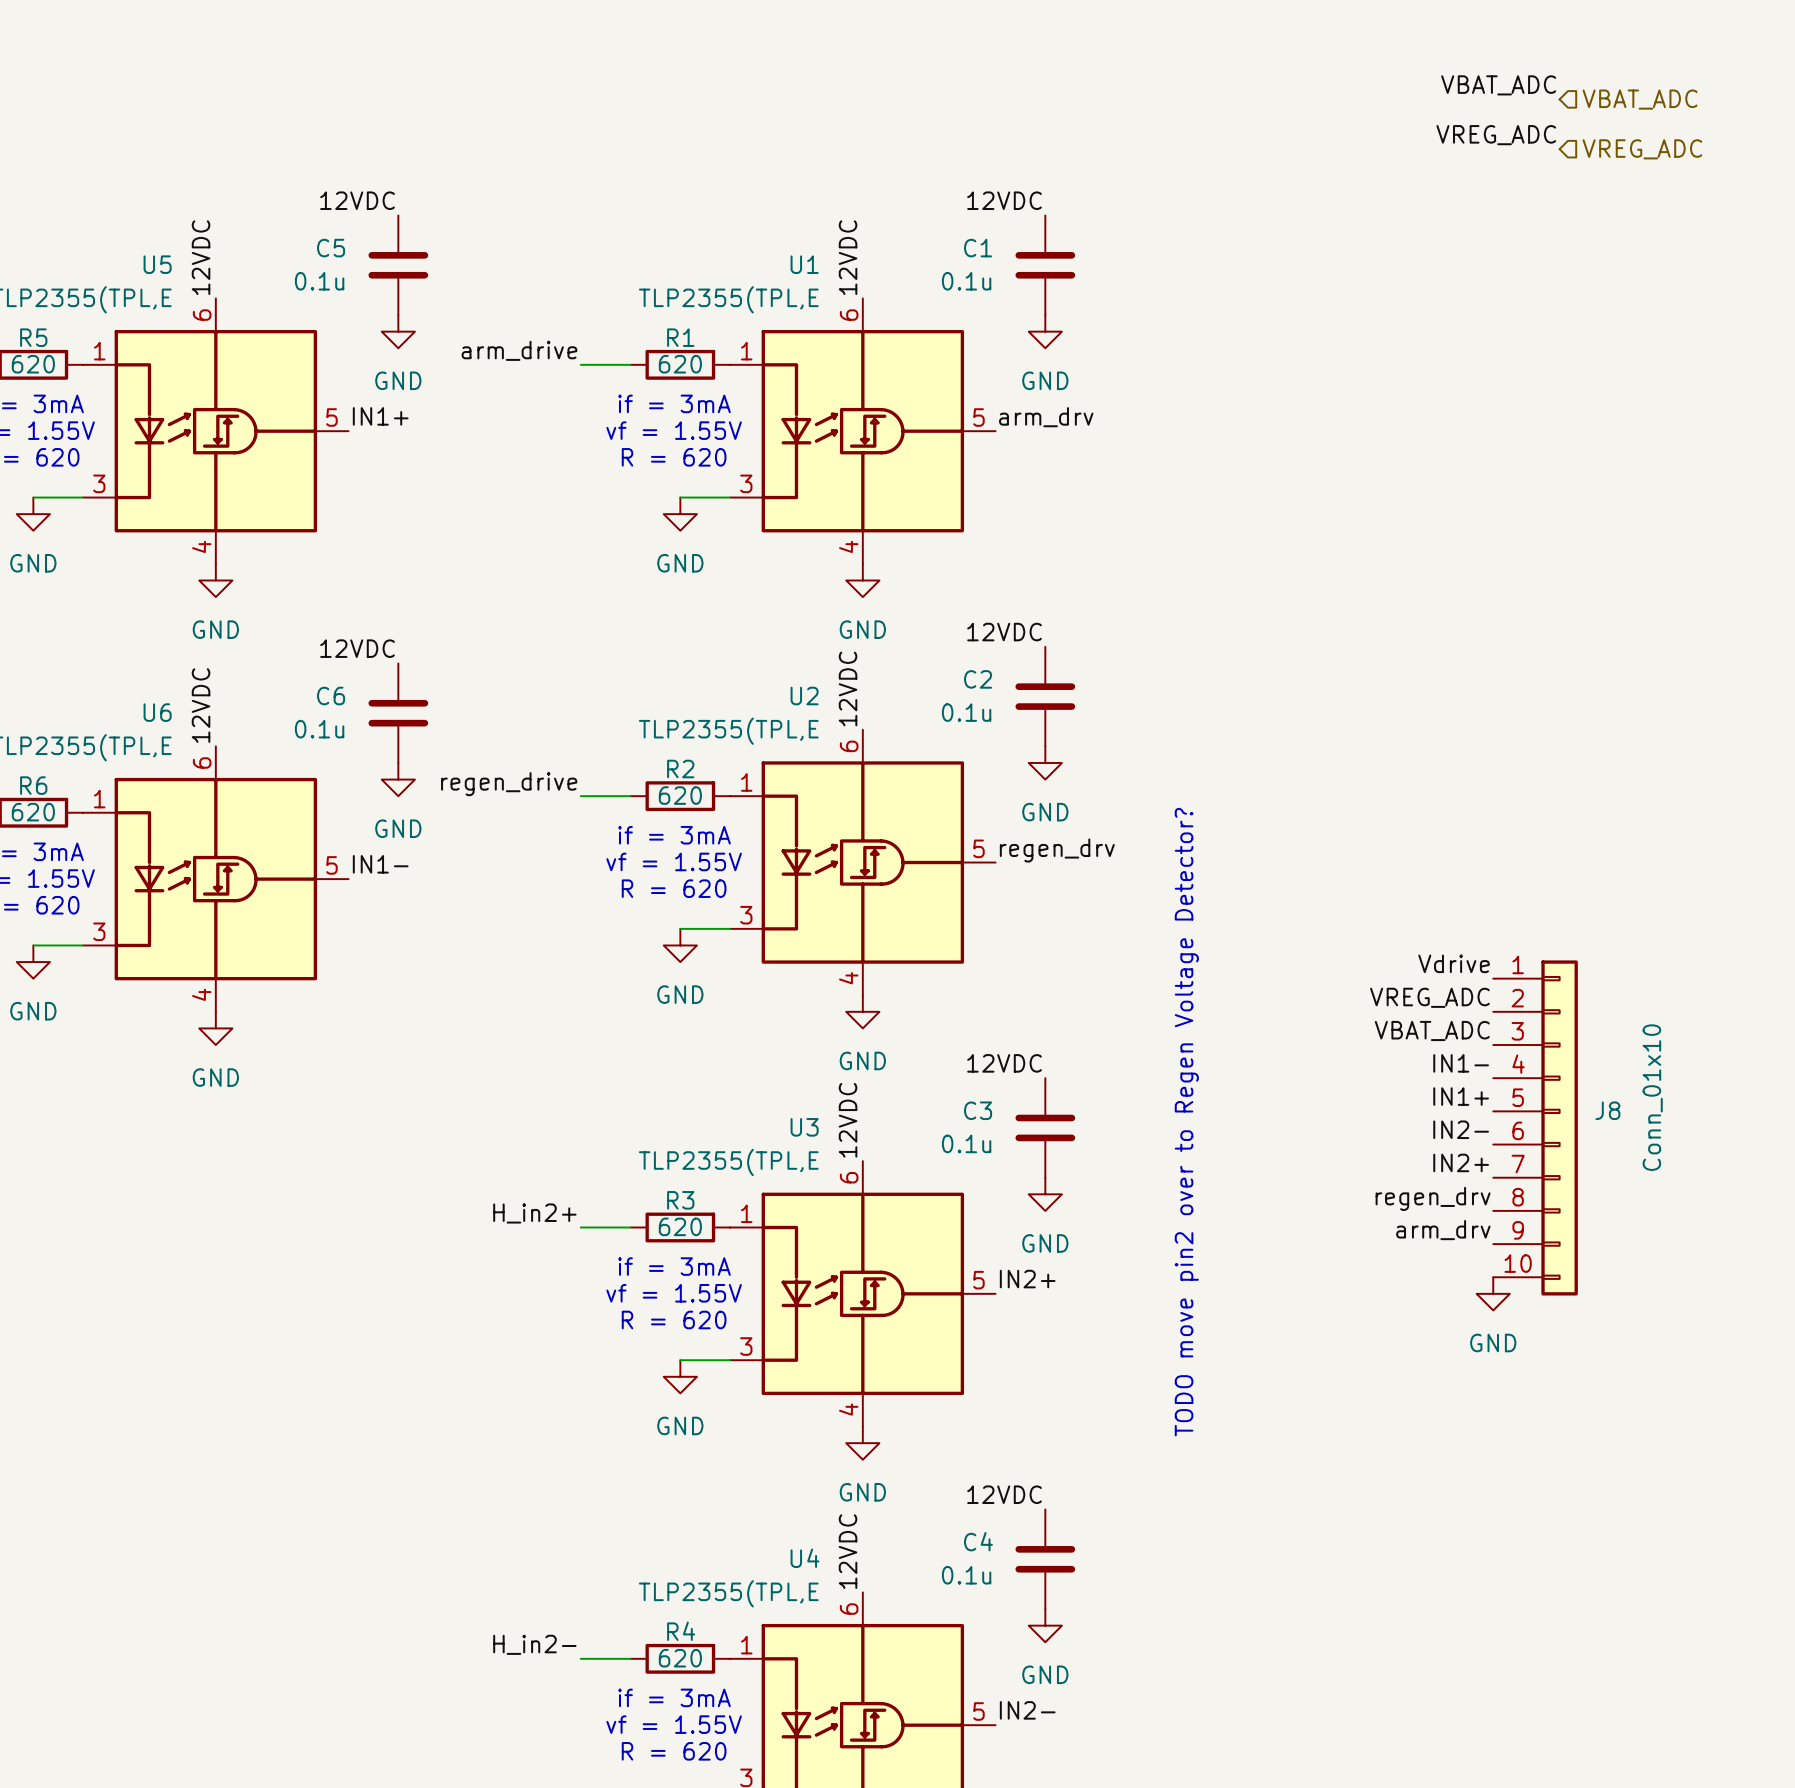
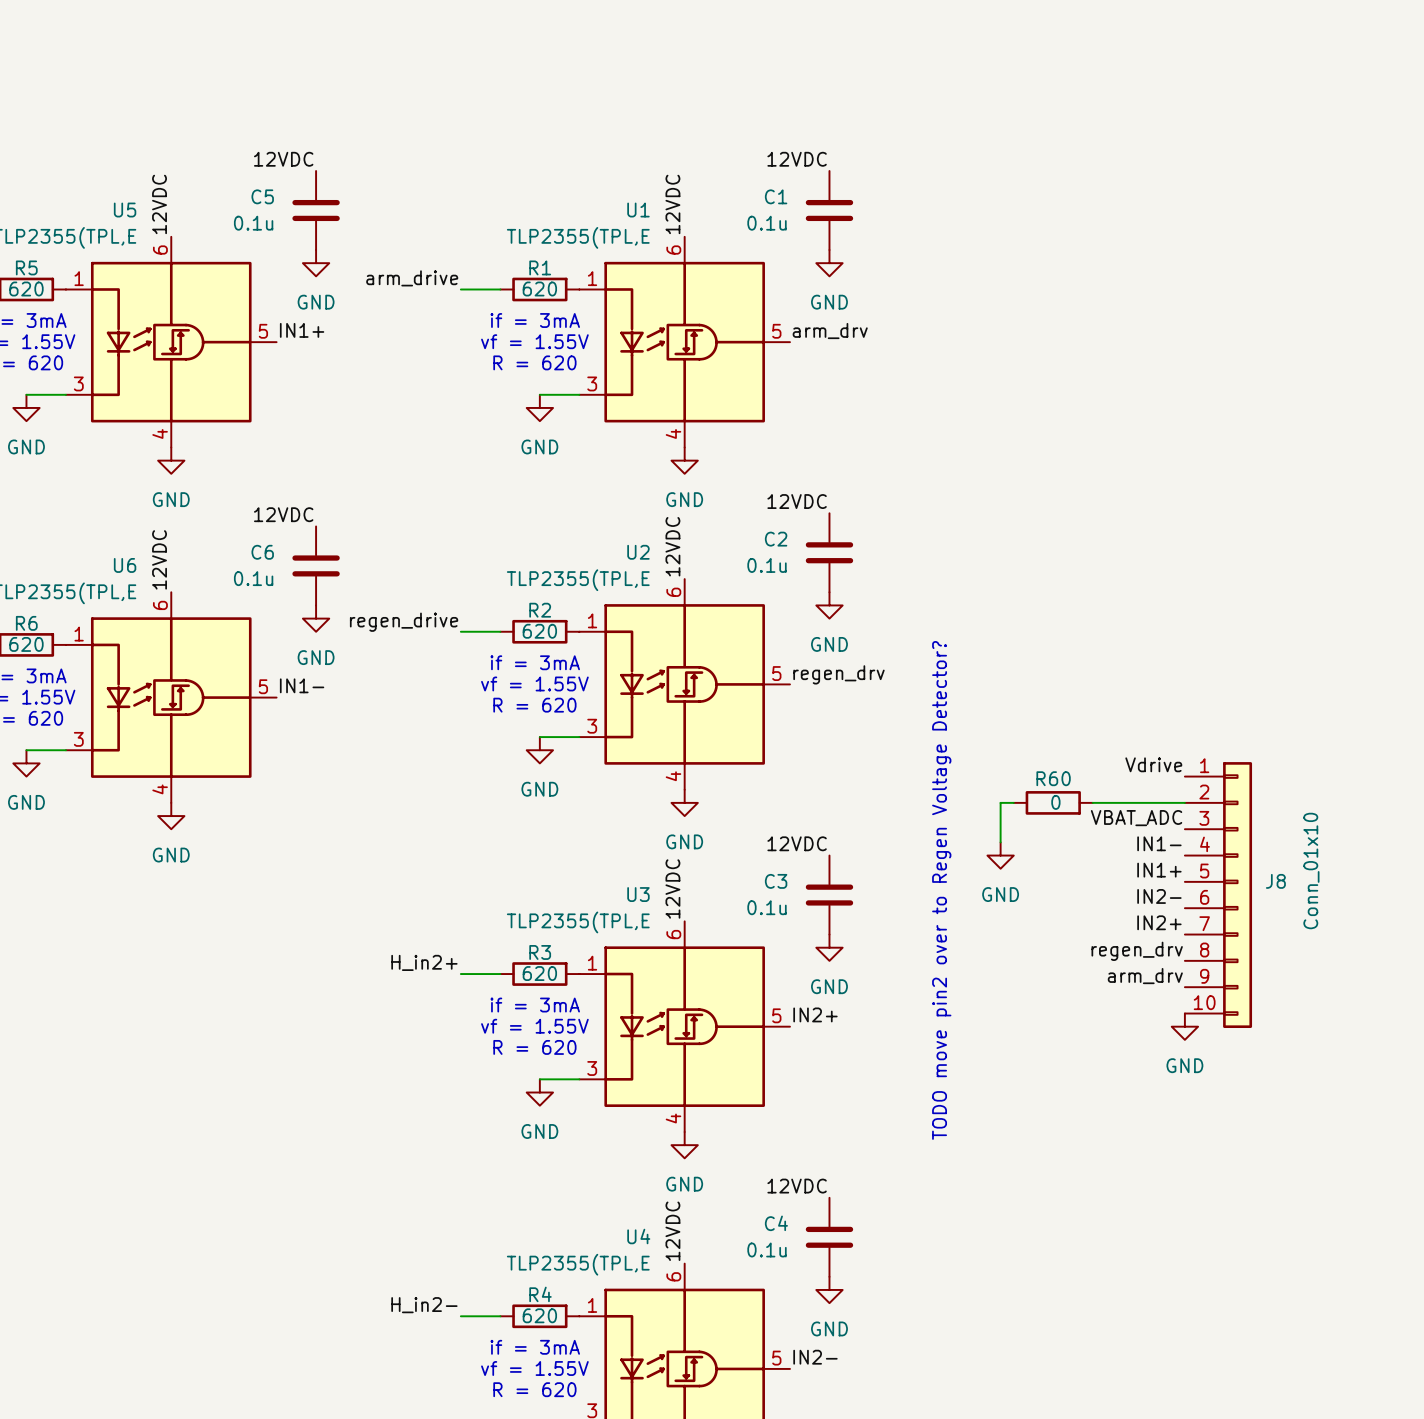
label: VBAT_ADC (1498, 85) -> none
hierarchical label: VBAT_ADC (1640, 99) -> none
label: VREG_ADC (1496, 135) -> none
hierarchical label: VREG_ADC (1642, 149) -> none
label: VREG_ADC (1429, 997) -> none
wire: none -> (1013, 802) (1000, 802) (1000, 842)
R60: none -> 0 (1053, 802)
wire: none -> (1092, 802) (1184, 802)
power symbol: none -> GND (1000, 855)

